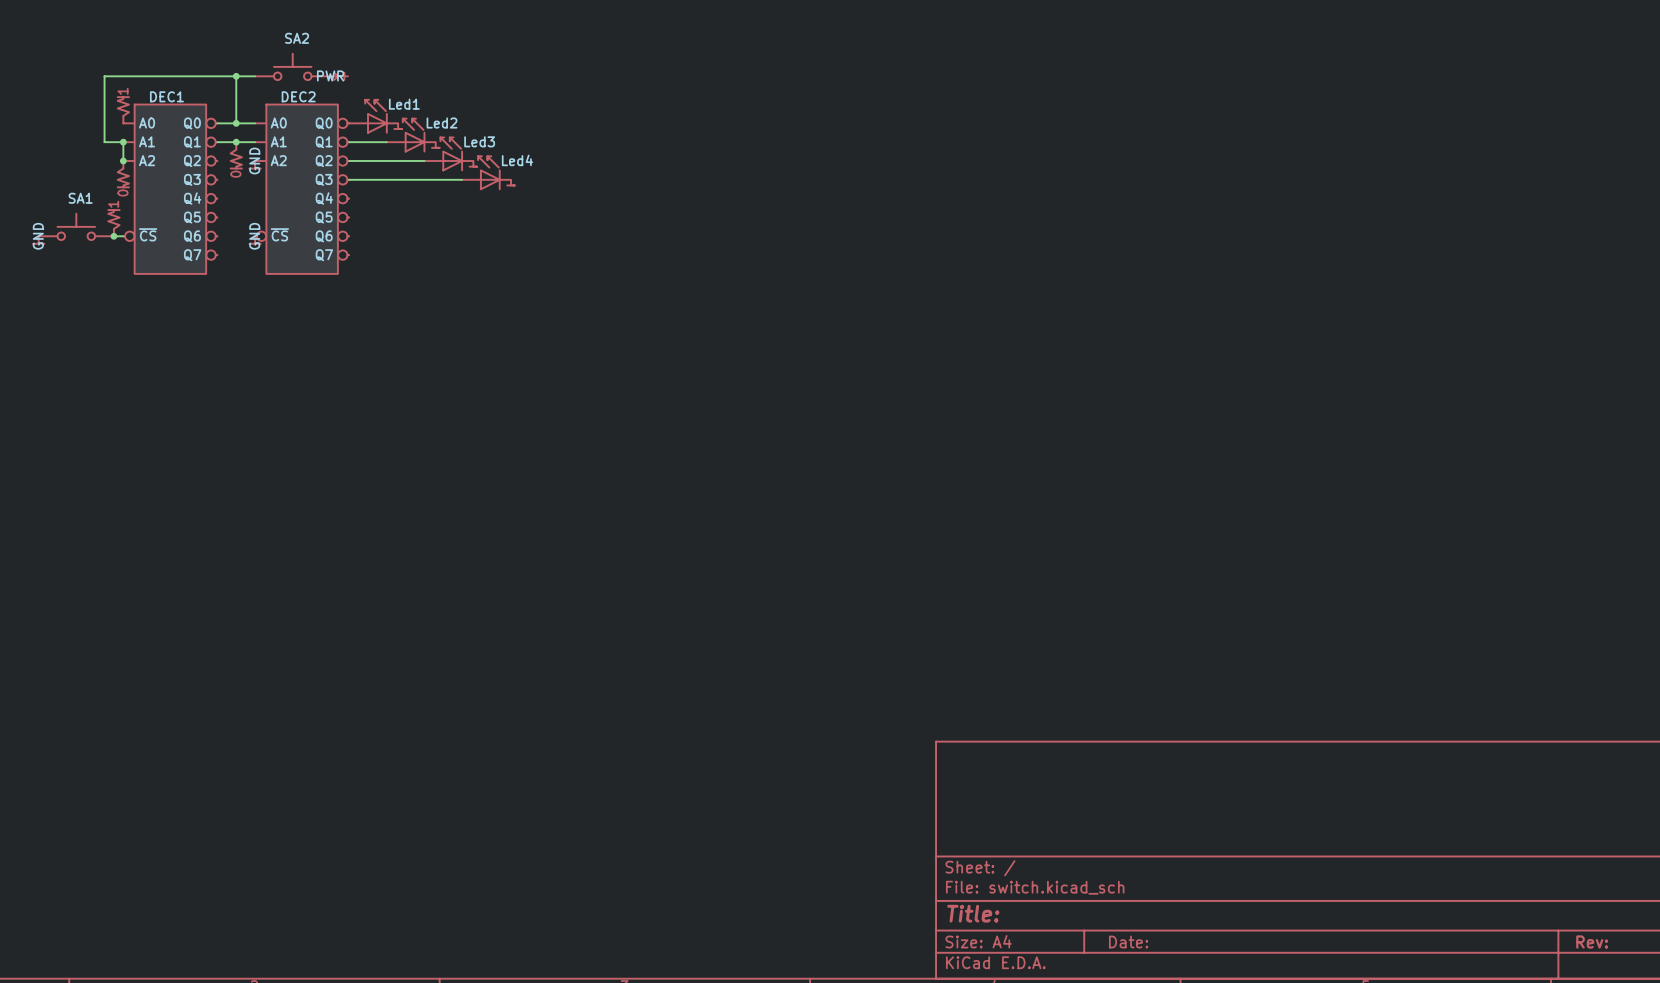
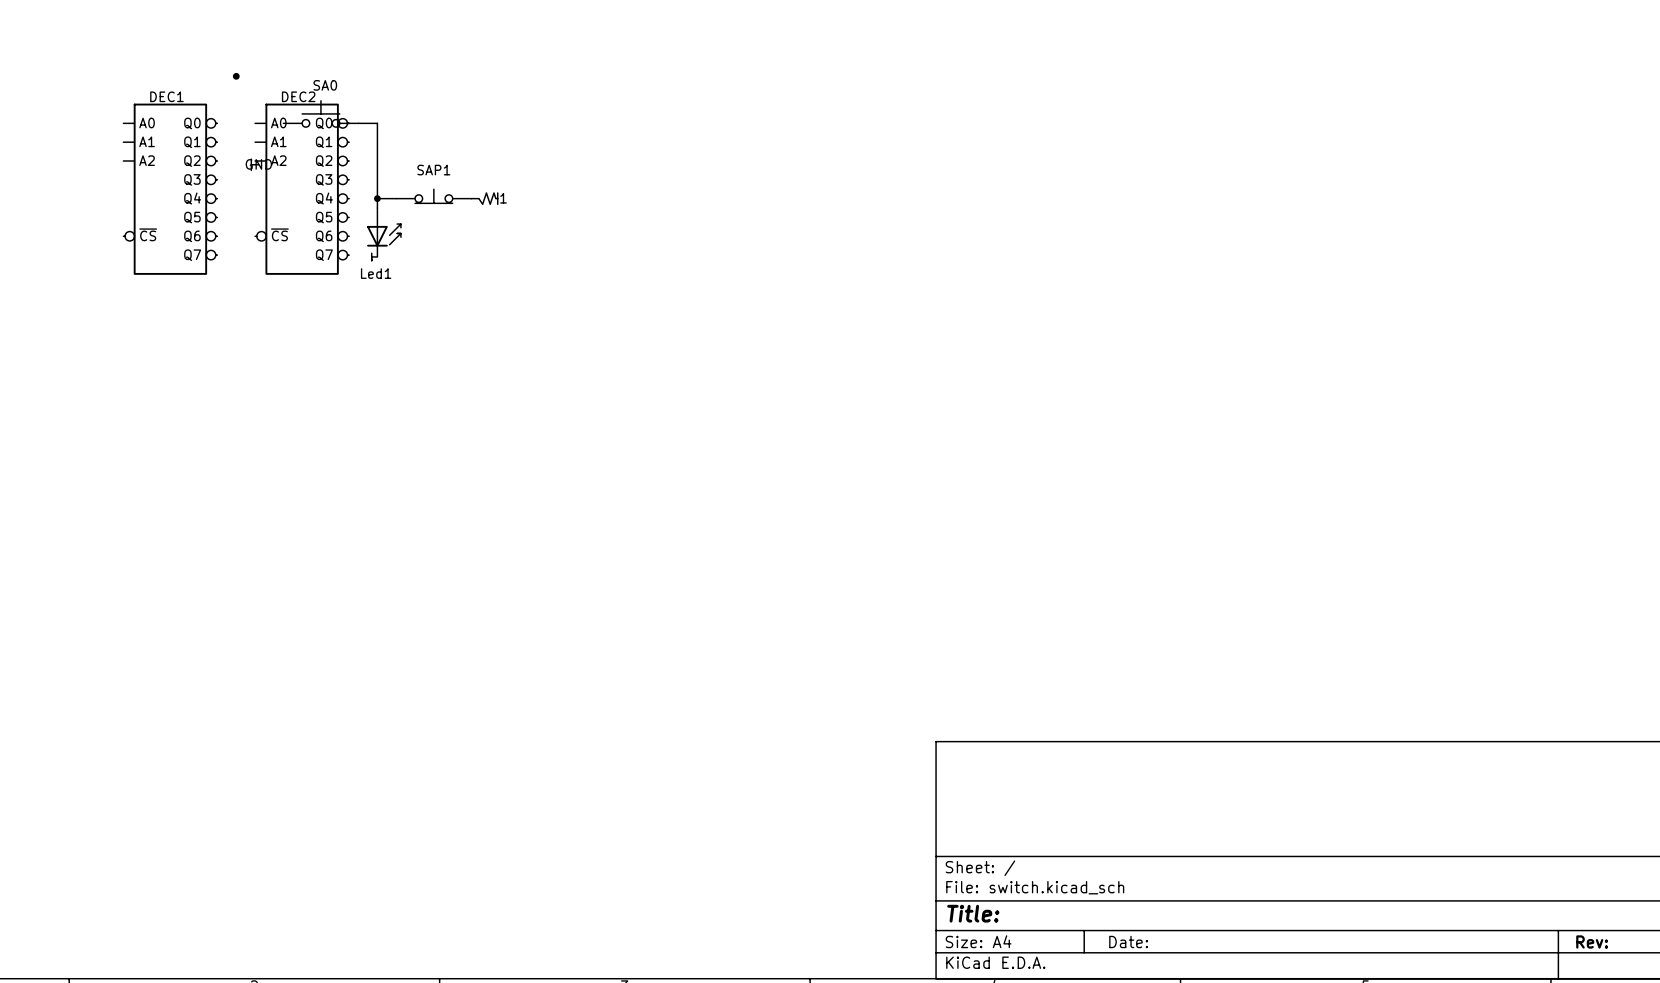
SA2: (292, 66) -> none
wire: (236, 76) (236, 123) -> none
wire: (255, 76) (104, 76) (104, 142) (123, 142) (123, 161) -> none
power symbol: PWR (334, 76) -> none
Led1 name position: Led1 (404, 104) -> Led1 (376, 273)
part: (123, 110) -> none
SA0: none -> (320, 113)
Led1 position: (375, 116) -> (384, 234)
Led1 rotation: 0° (383, 116) -> 90° clockwise (384, 242)
wire: (217, 123) (255, 123) -> none
junction: (236, 123) -> none
wire: none -> (358, 123) (377, 123) (377, 208)
Led2: (413, 135) -> none
junction: (123, 142) -> none
wire: (217, 142) (255, 142) -> none
junction: (236, 142) -> none
wire: (349, 142) (386, 142) -> none
Led3: (450, 154) -> none
part: (236, 155) -> none
junction: (123, 161) -> none
wire: (349, 161) (424, 161) -> none
power symbol rotation: 0° (255, 168) -> 90° clockwise (251, 164)
Led4: (488, 173) -> none
part: (123, 174) -> none
wire: (349, 179) (462, 179) -> none
SAP1: none -> (433, 196)
wire: none -> (377, 198) (396, 198)
junction: none -> (377, 198)
part: none -> (484, 198)
part: (113, 223) -> none
SA1: (76, 226) -> none
wire: (113, 236) (123, 236) -> none
junction: (113, 236) -> none
power symbol: GND (38, 240) -> none
power symbol: GND (255, 240) -> none

